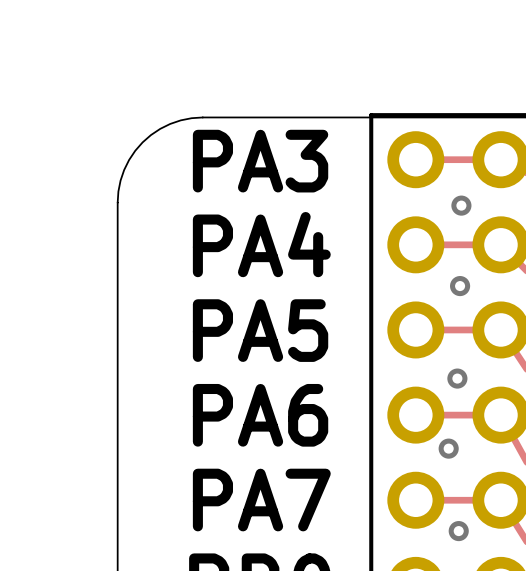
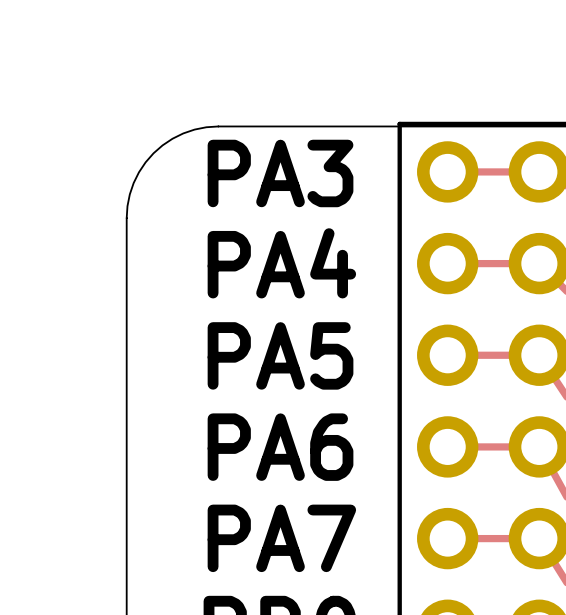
via: (461, 205) -> none
via: (460, 286) -> none
via: (457, 378) -> none
via: (448, 448) -> none
via: (458, 531) -> none

